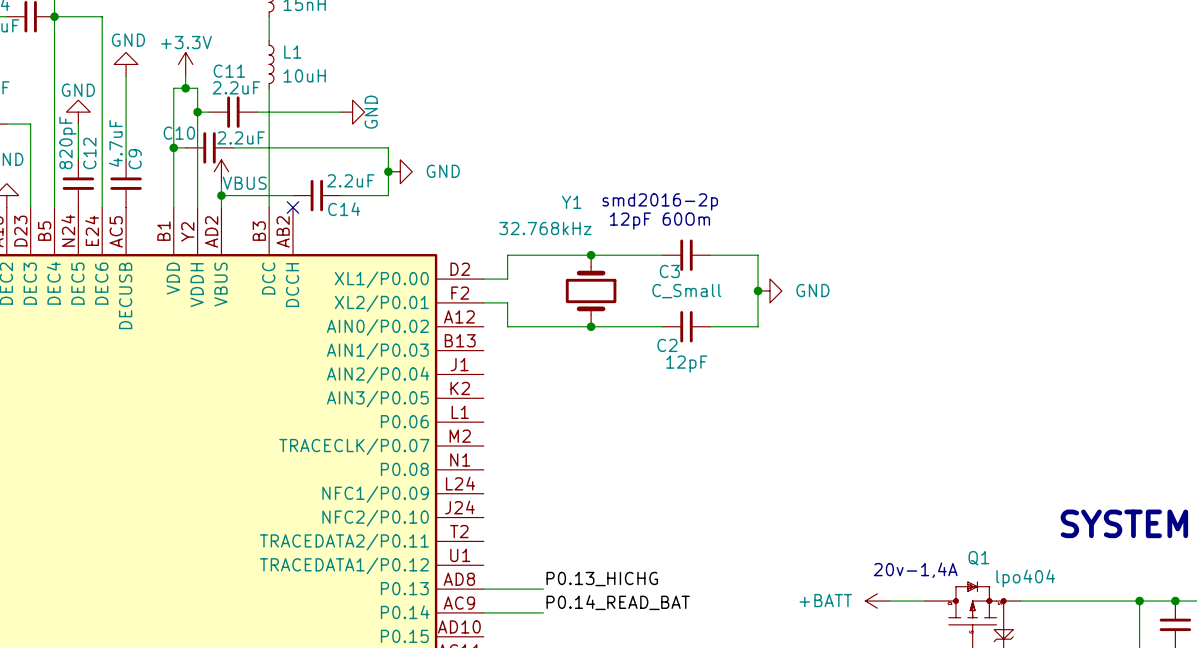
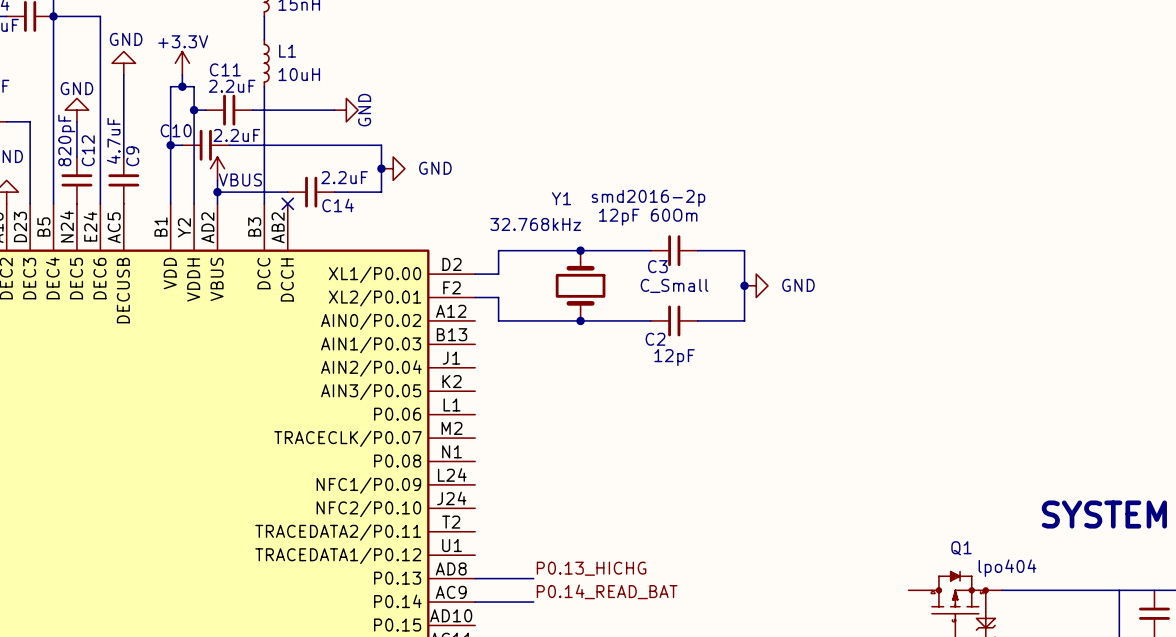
text: 20v-1,4A (915, 570) -> none
power symbol: +BATT (877, 601) -> none
wire: (889, 601) (924, 601) -> none
junction: (1139, 601) -> none
junction: (1175, 601) -> none

